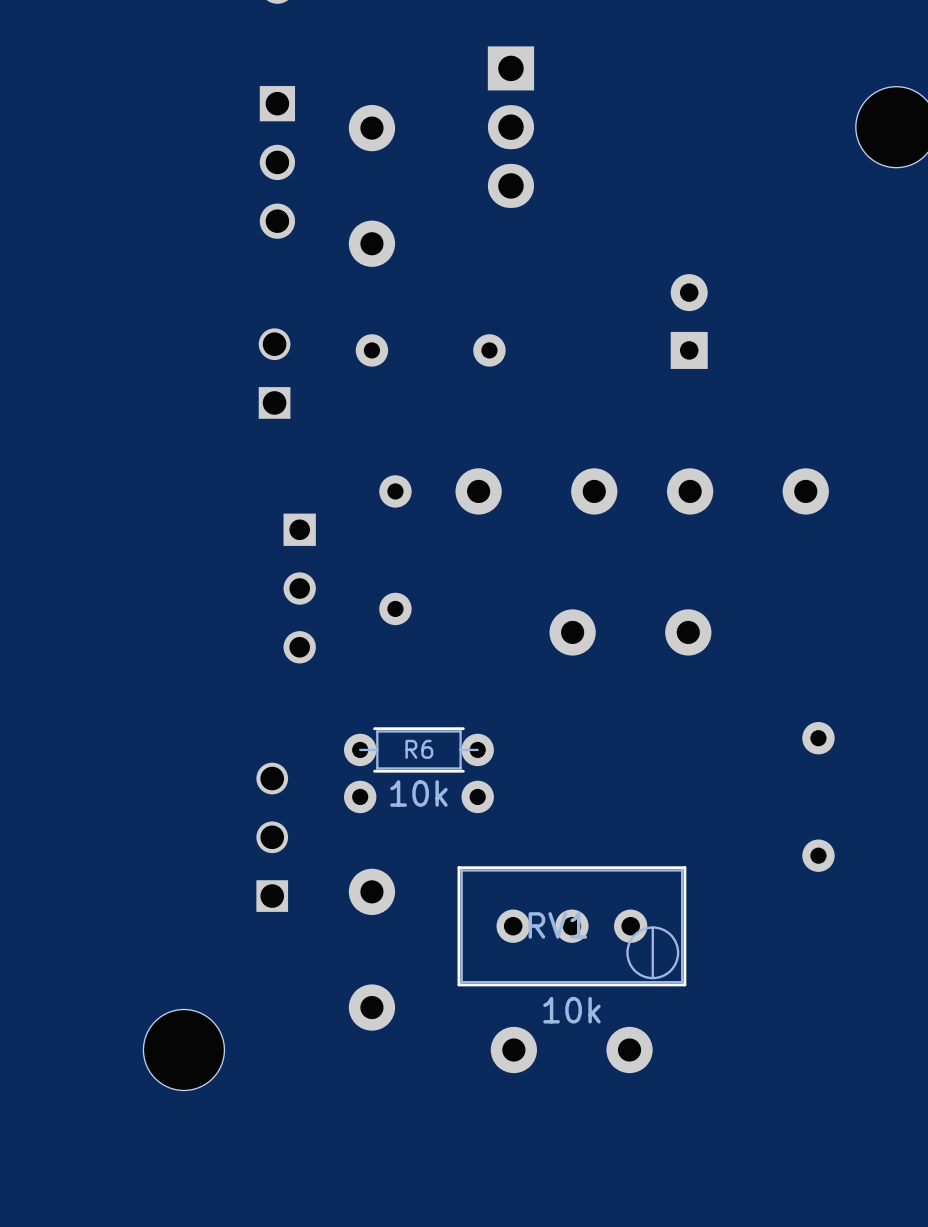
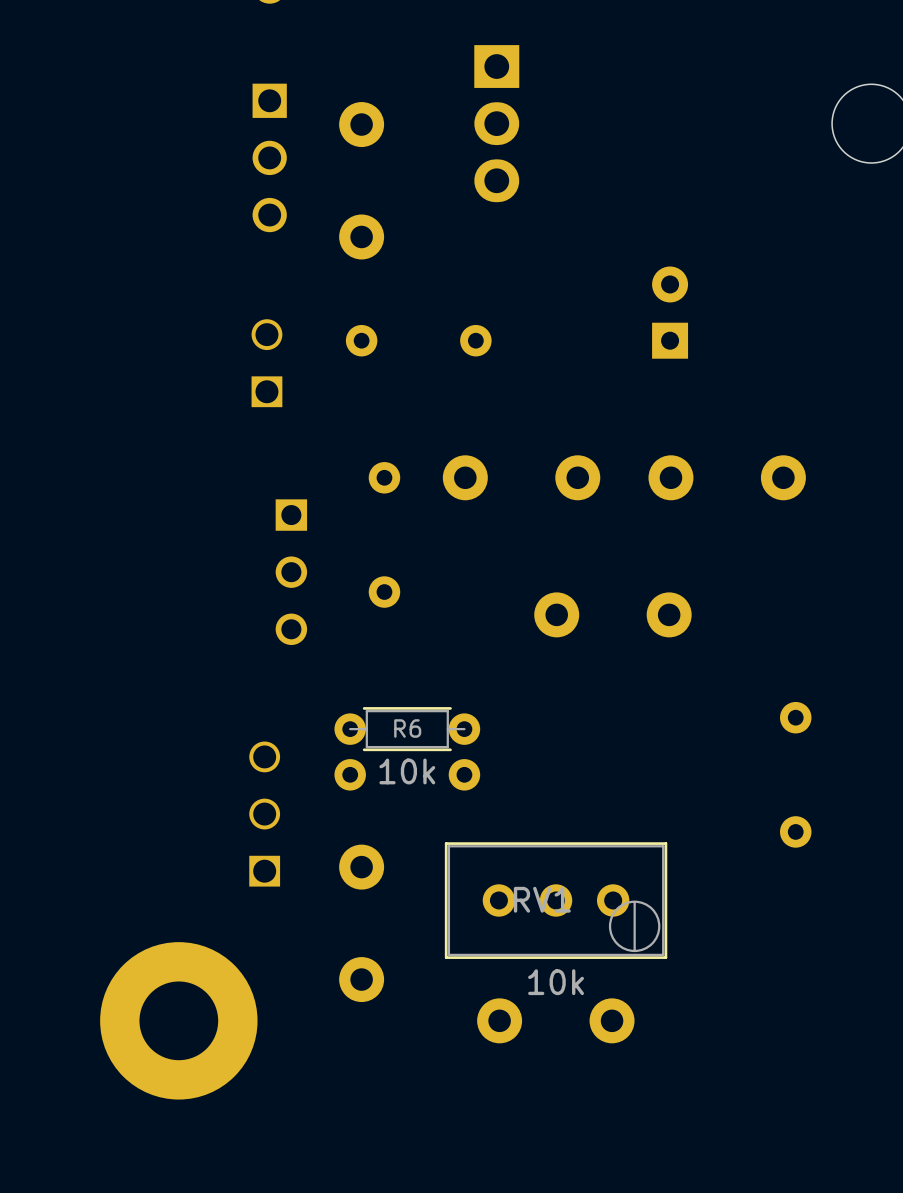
part footprint: [143, 1009, 225, 1091] -> [100, 942, 258, 1100]

